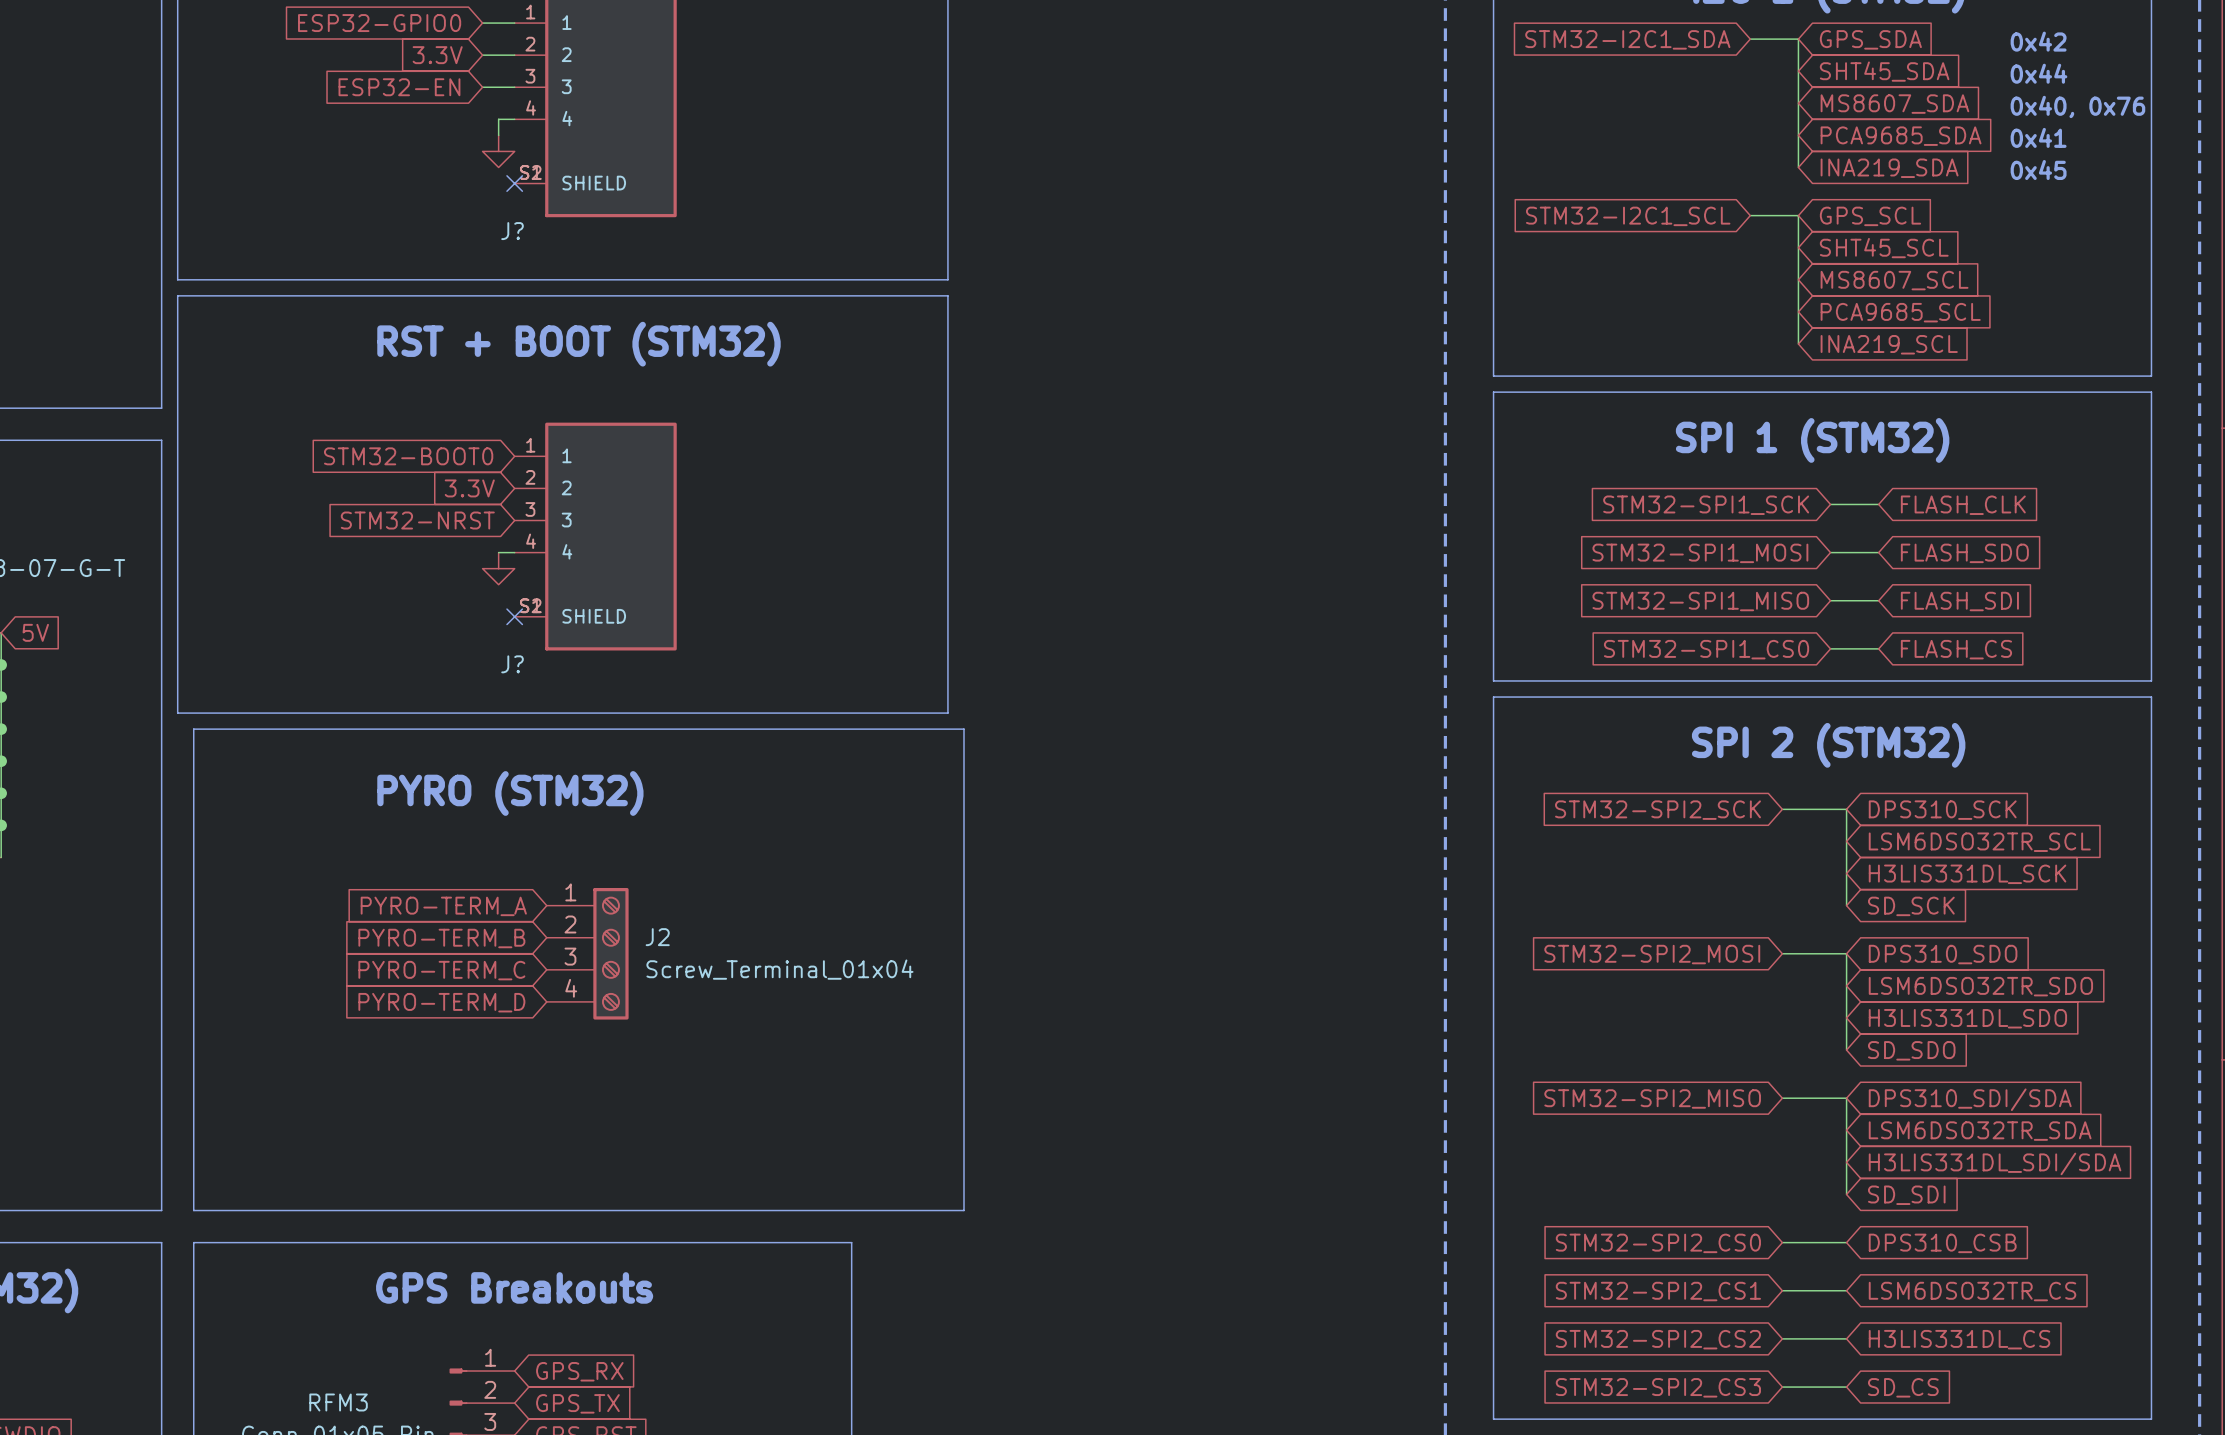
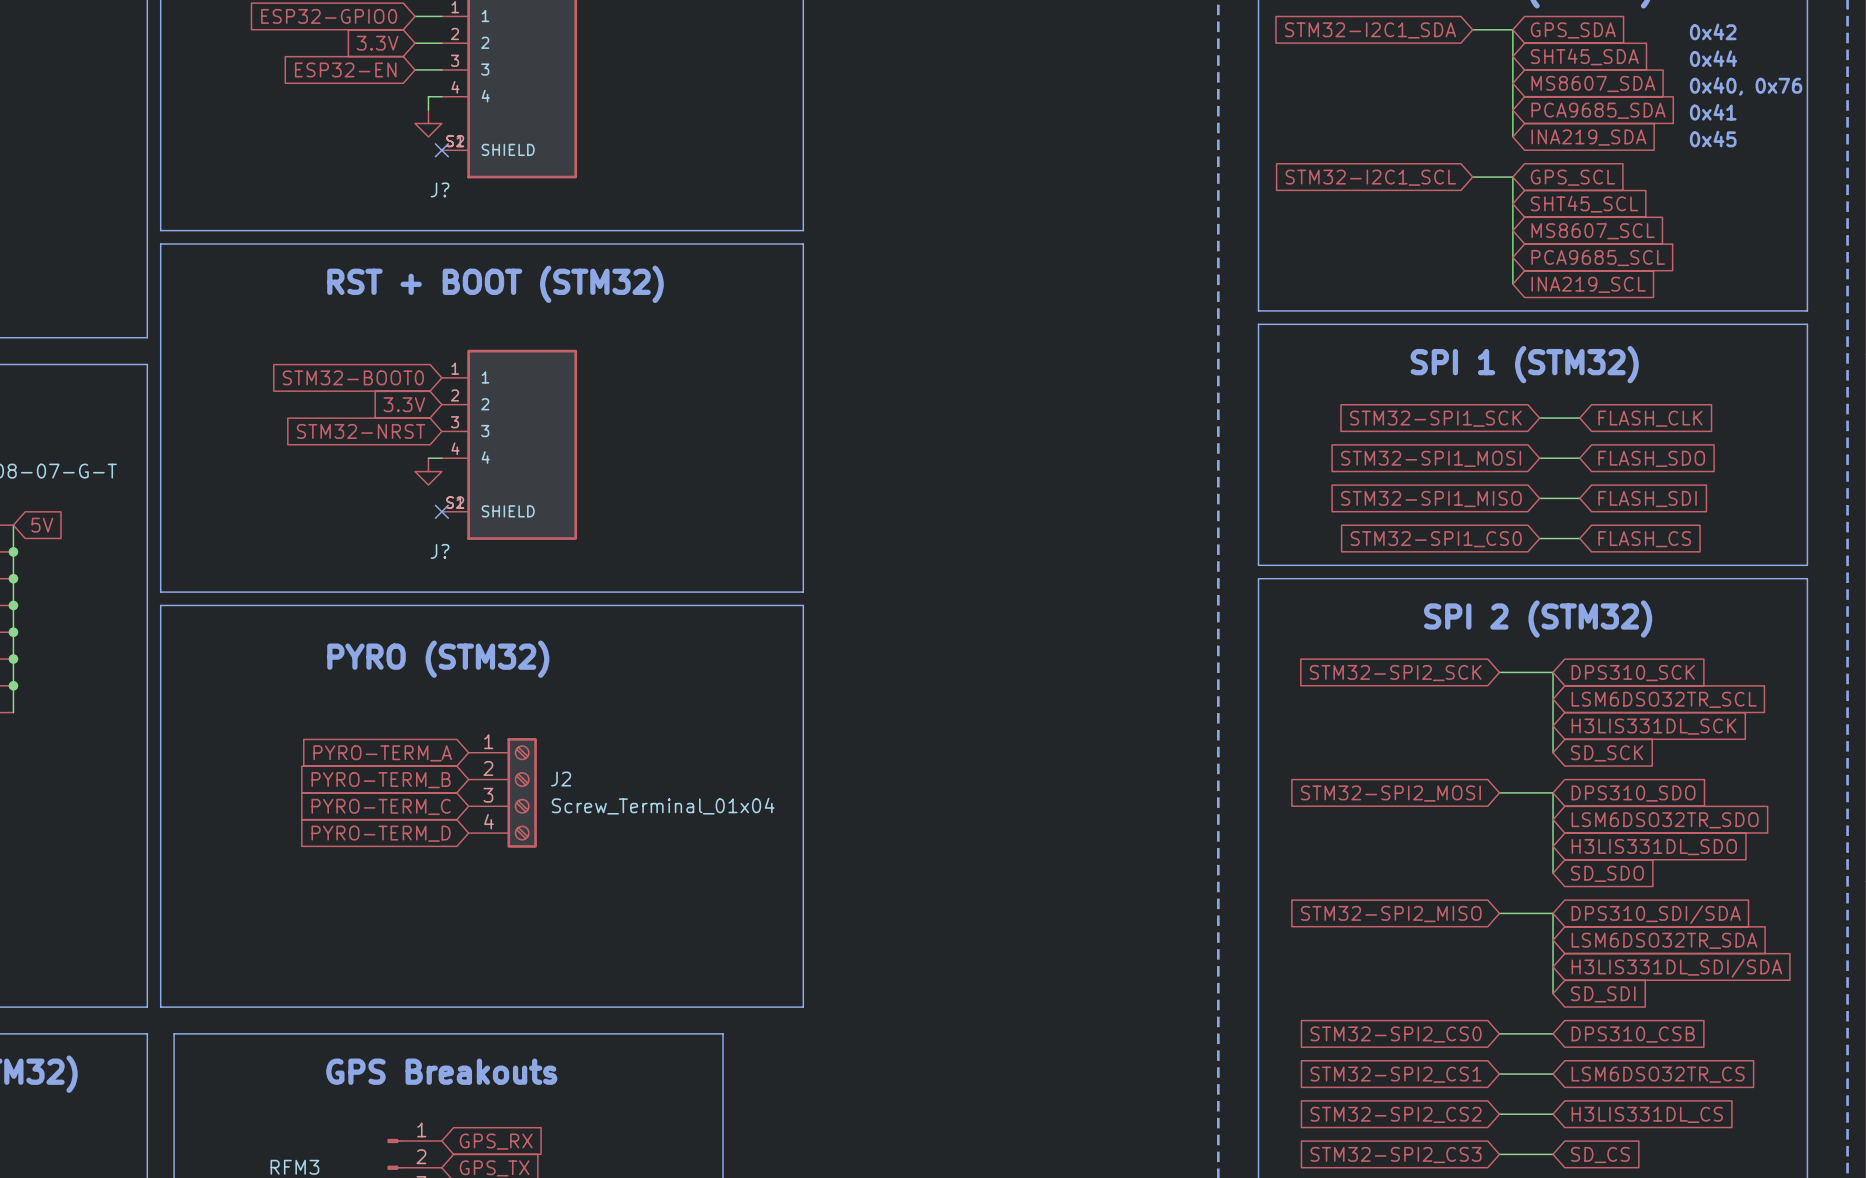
line: (193, 729) (193, 1210) -> (174, 605) (160, 605) (160, 1007) (174, 1007)
line: (947, 729) (964, 729) (964, 1210) (947, 1210) -> (803, 605) (803, 1007)

